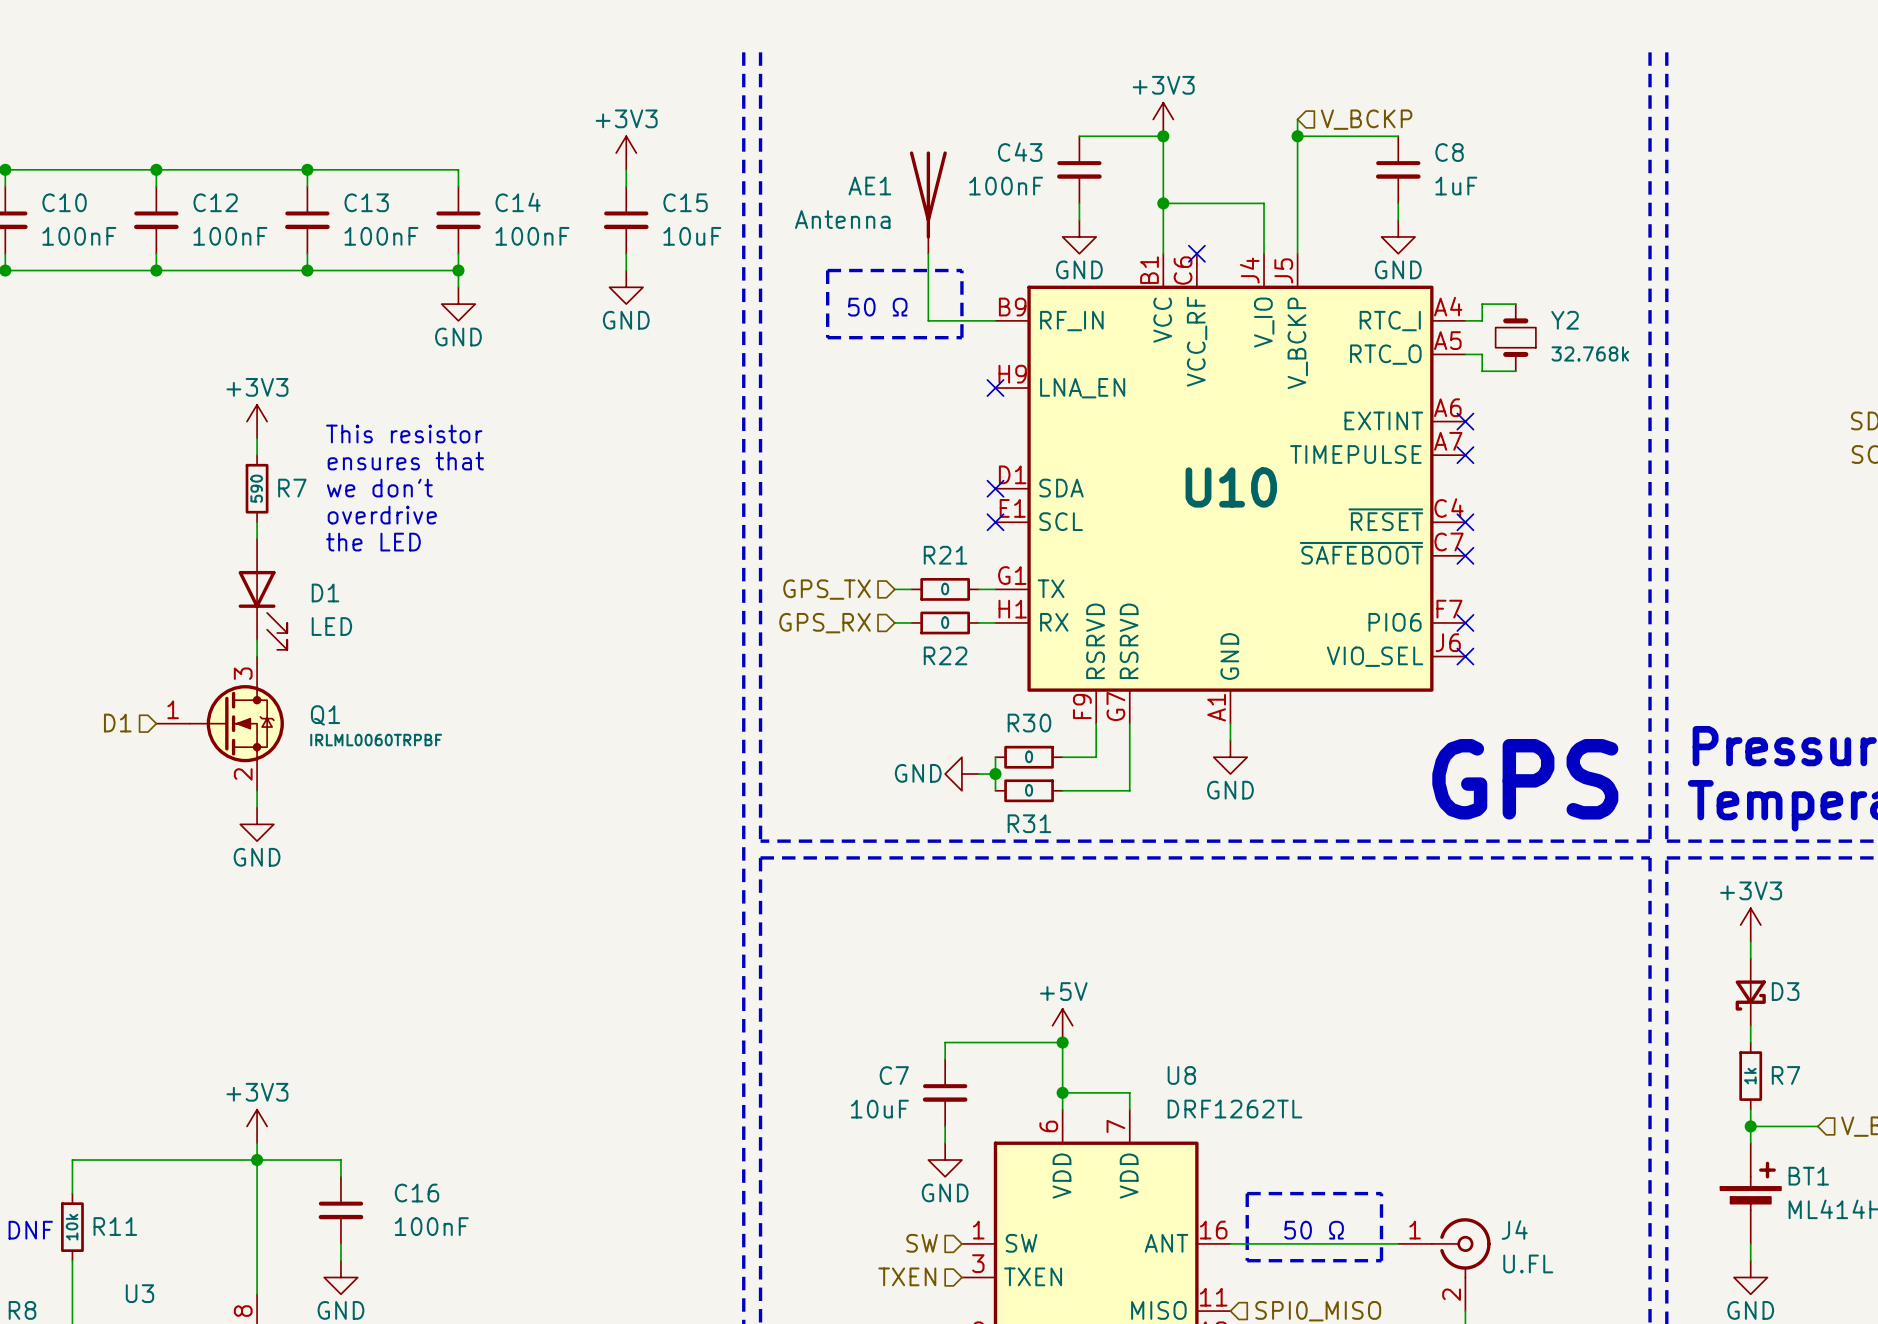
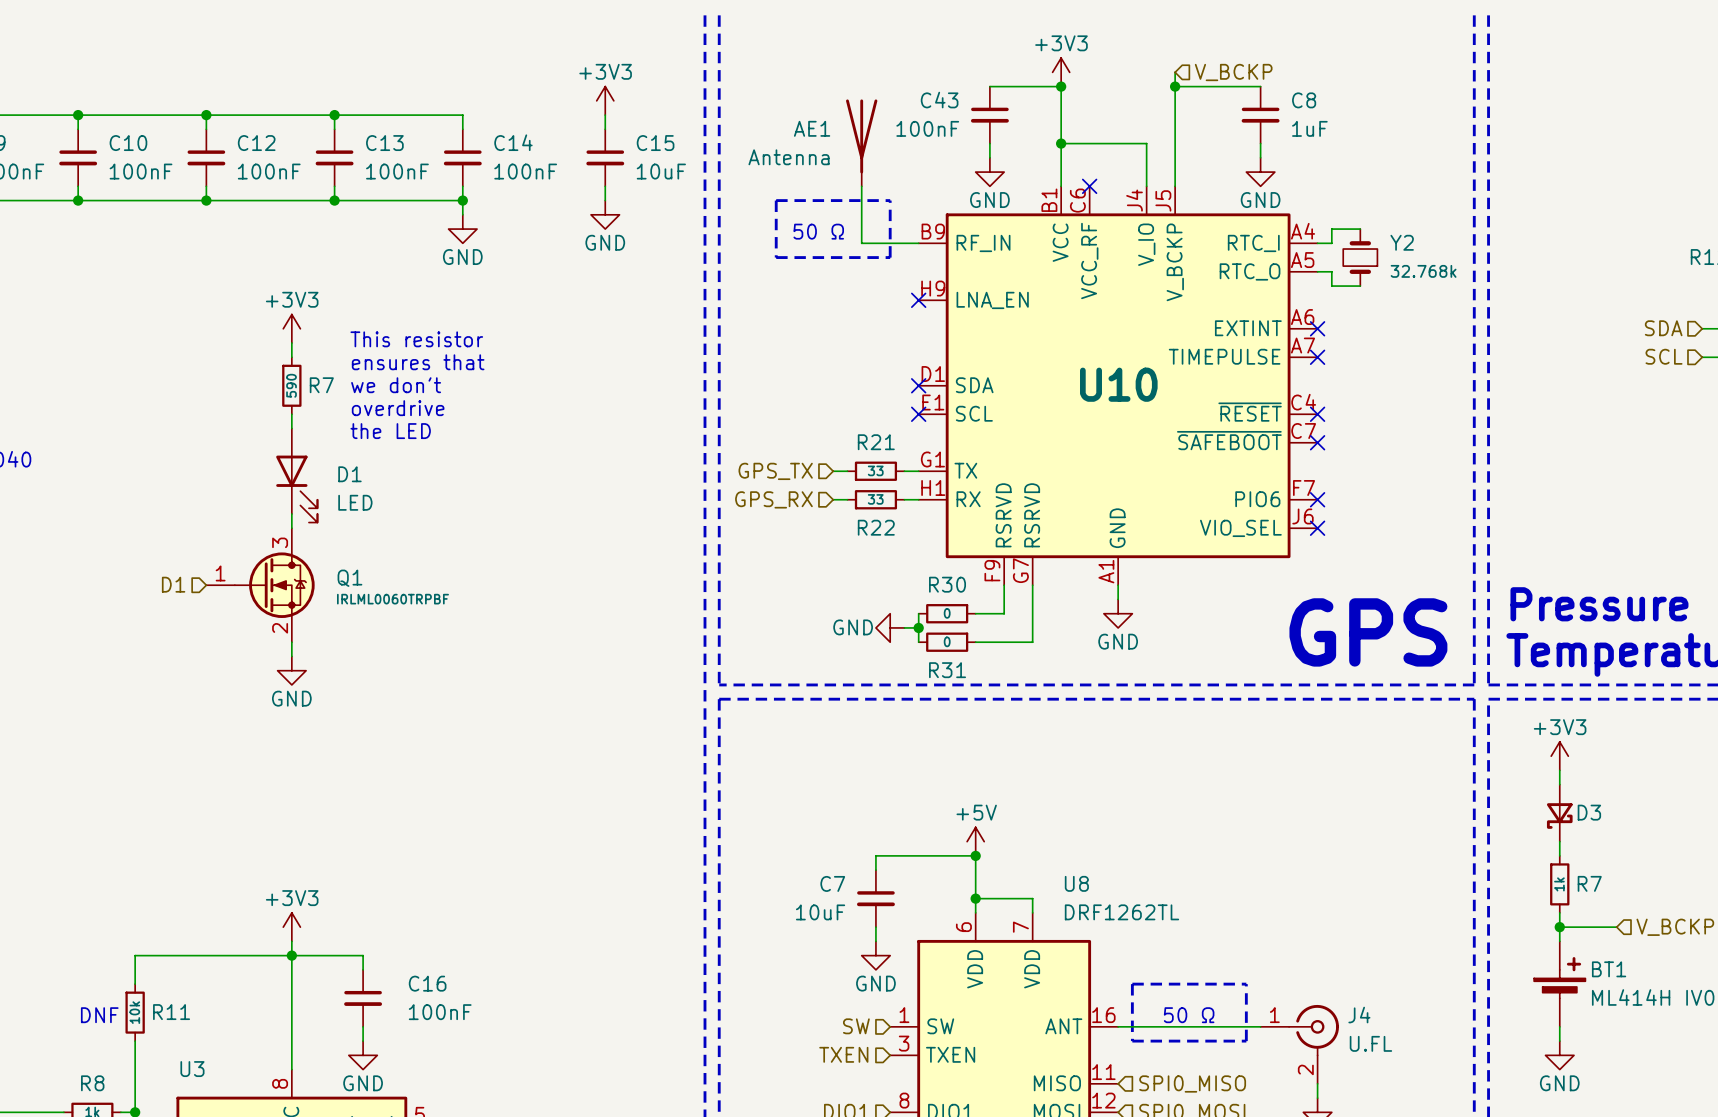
R21 value: 0 (945, 589) -> 33 (875, 470)
R22 value: 0 (945, 622) -> 33 (875, 499)

